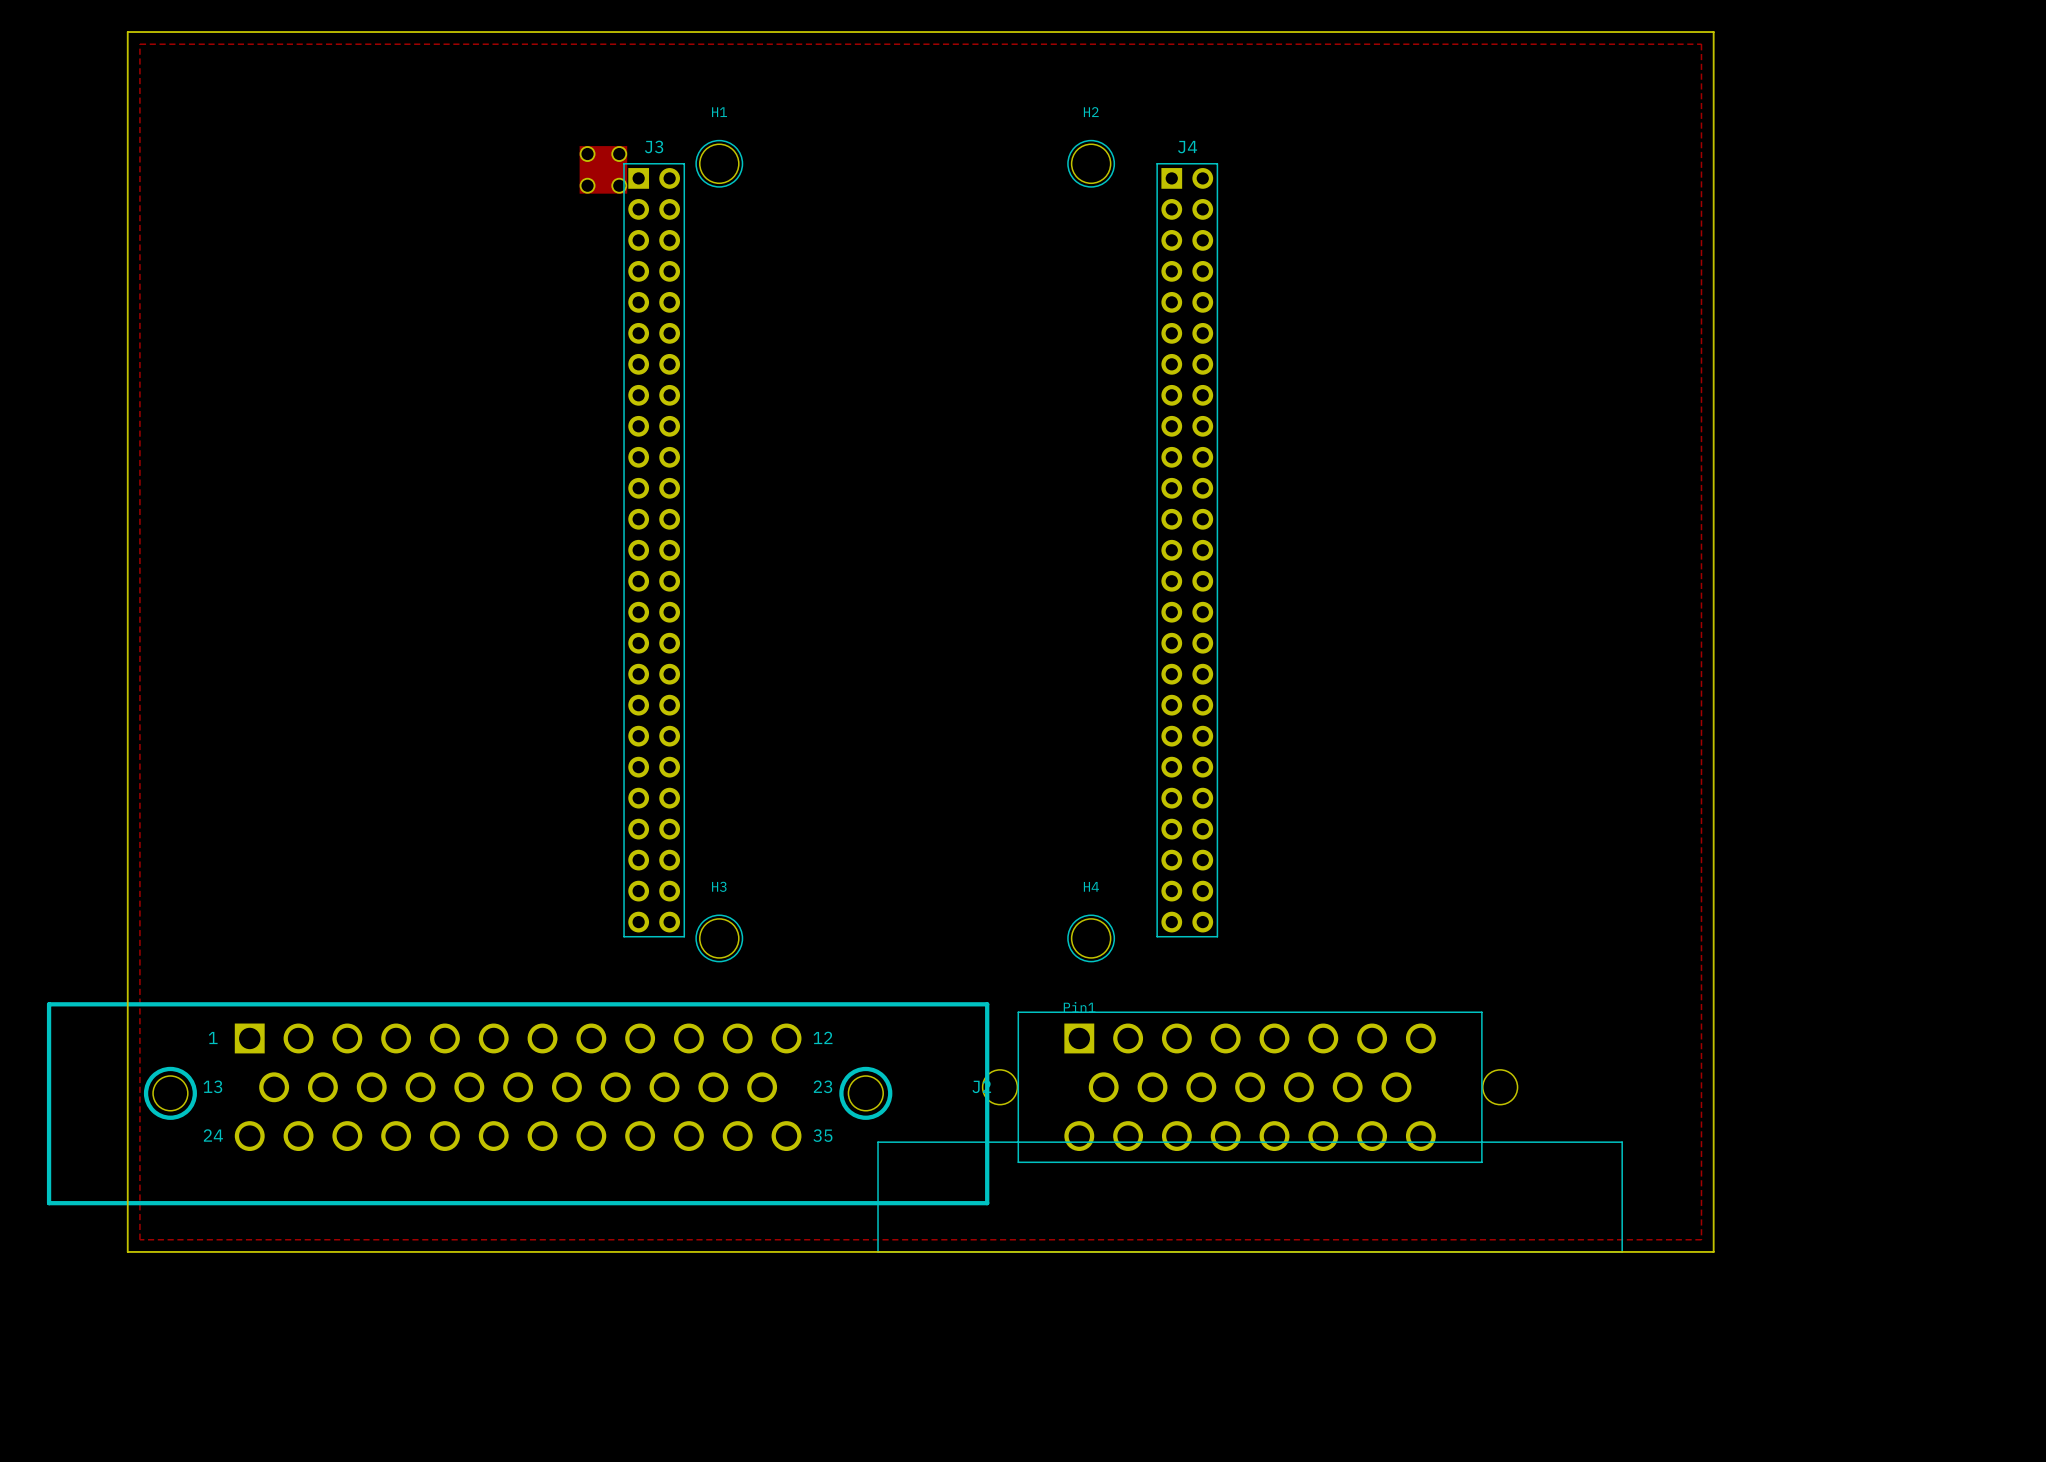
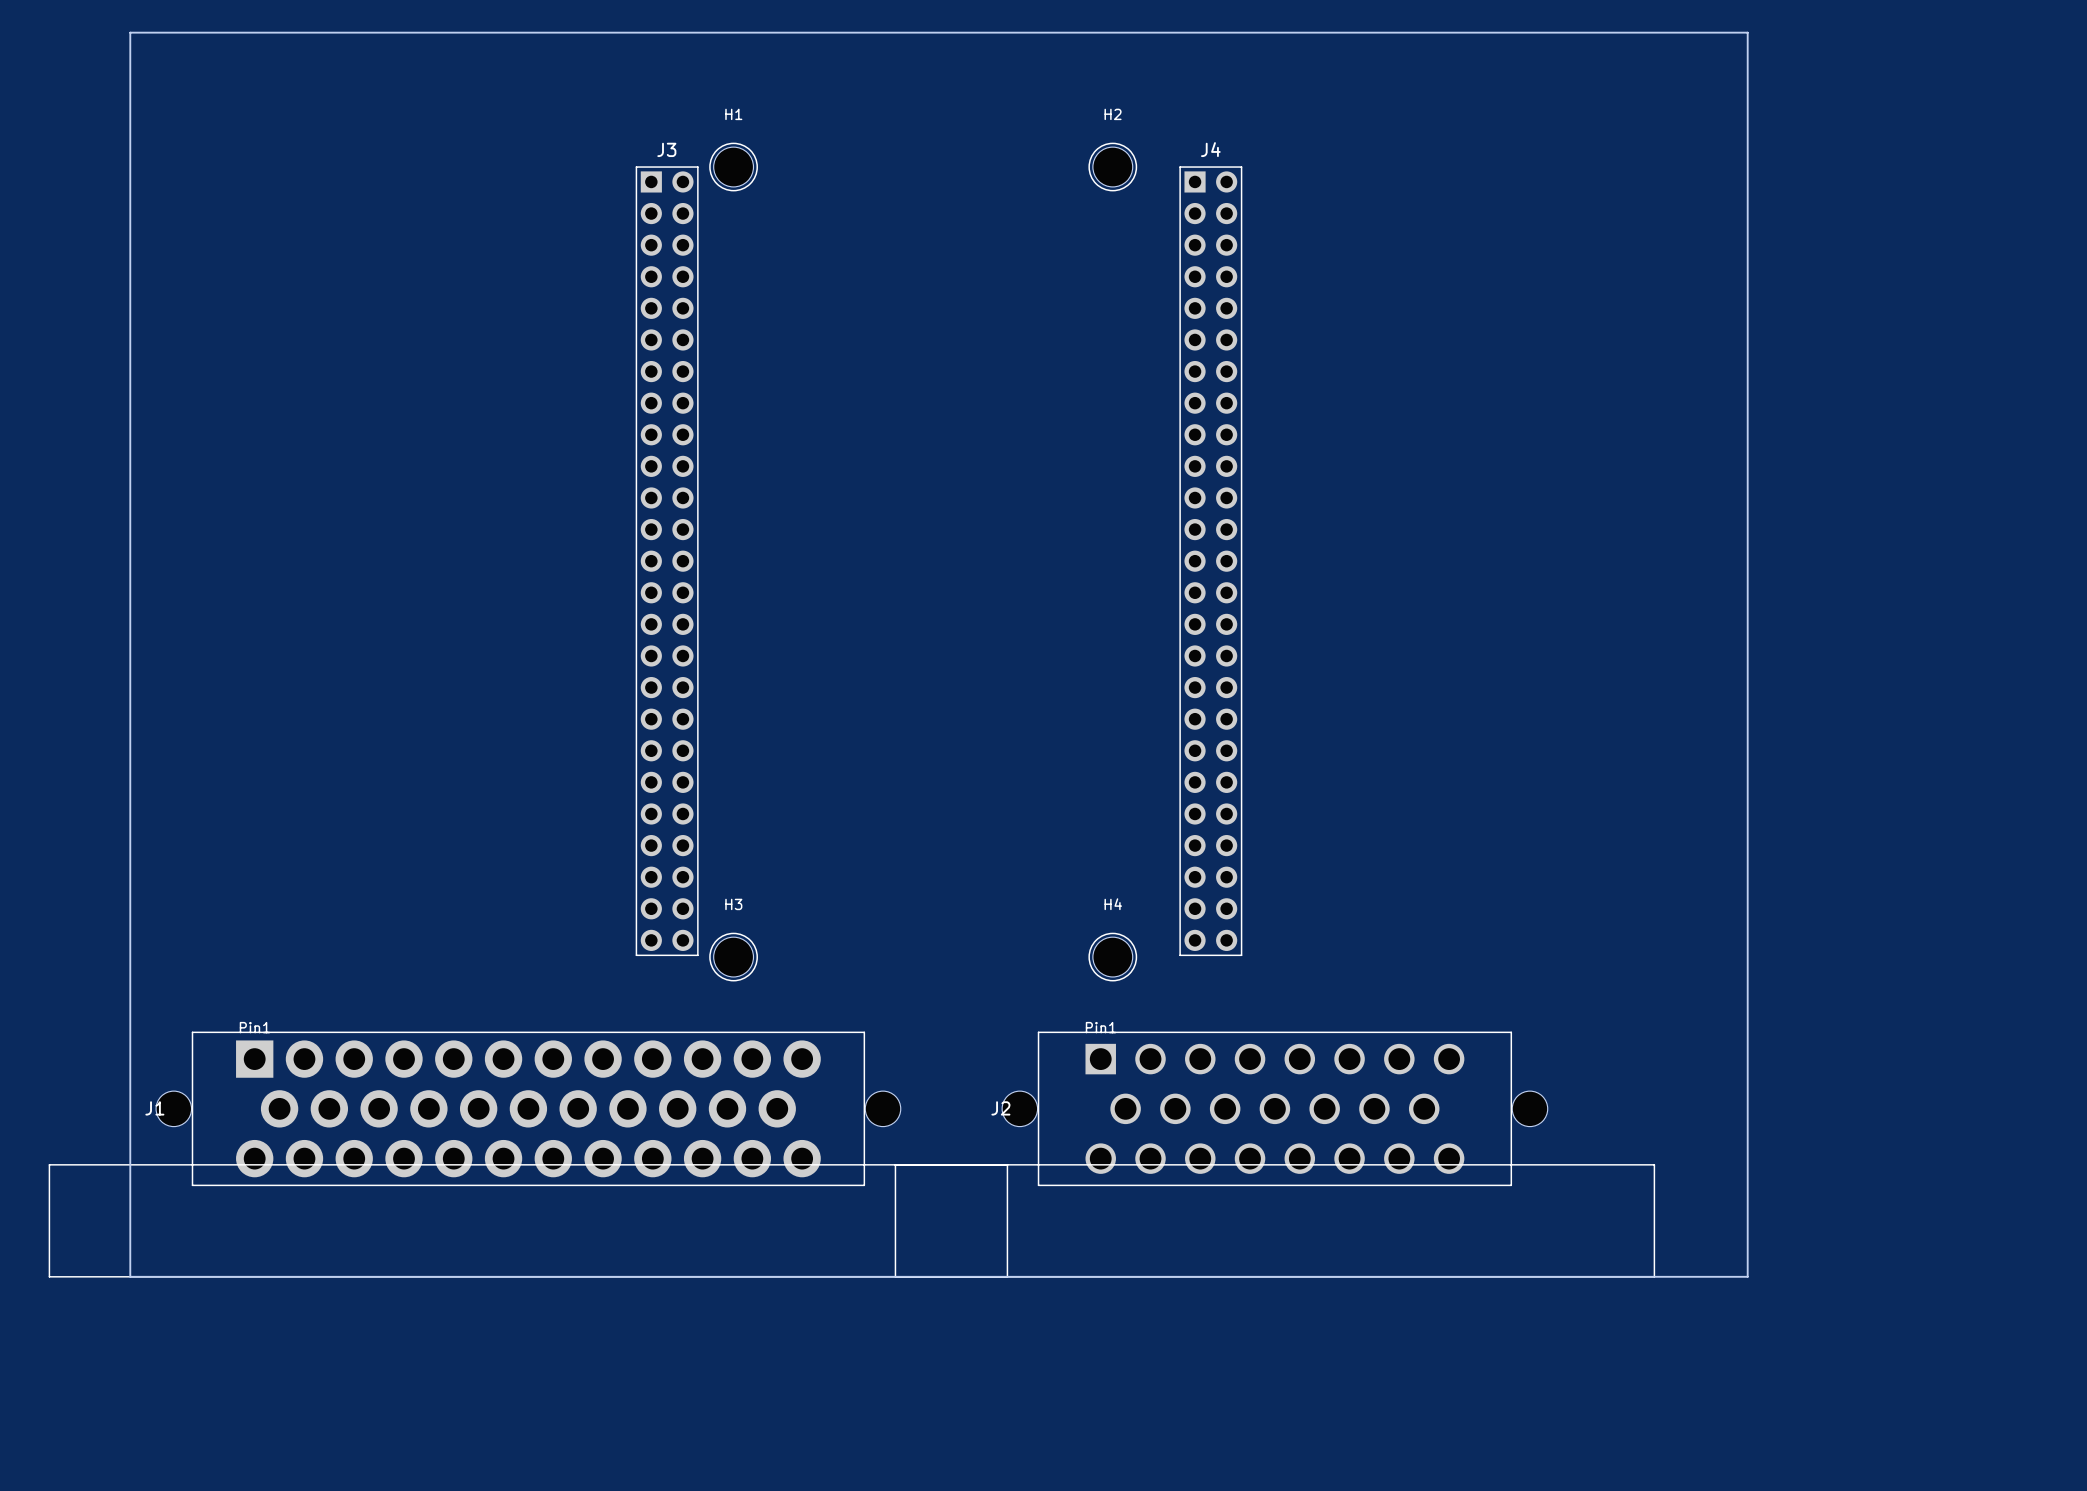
zone outline: (139, 44) (1701, 44) (1701, 1239) (139, 1239) (139, 44) -> none
part: (603, 169) -> none
part: (518, 1103) -> none
J1: none -> (528, 1154)

